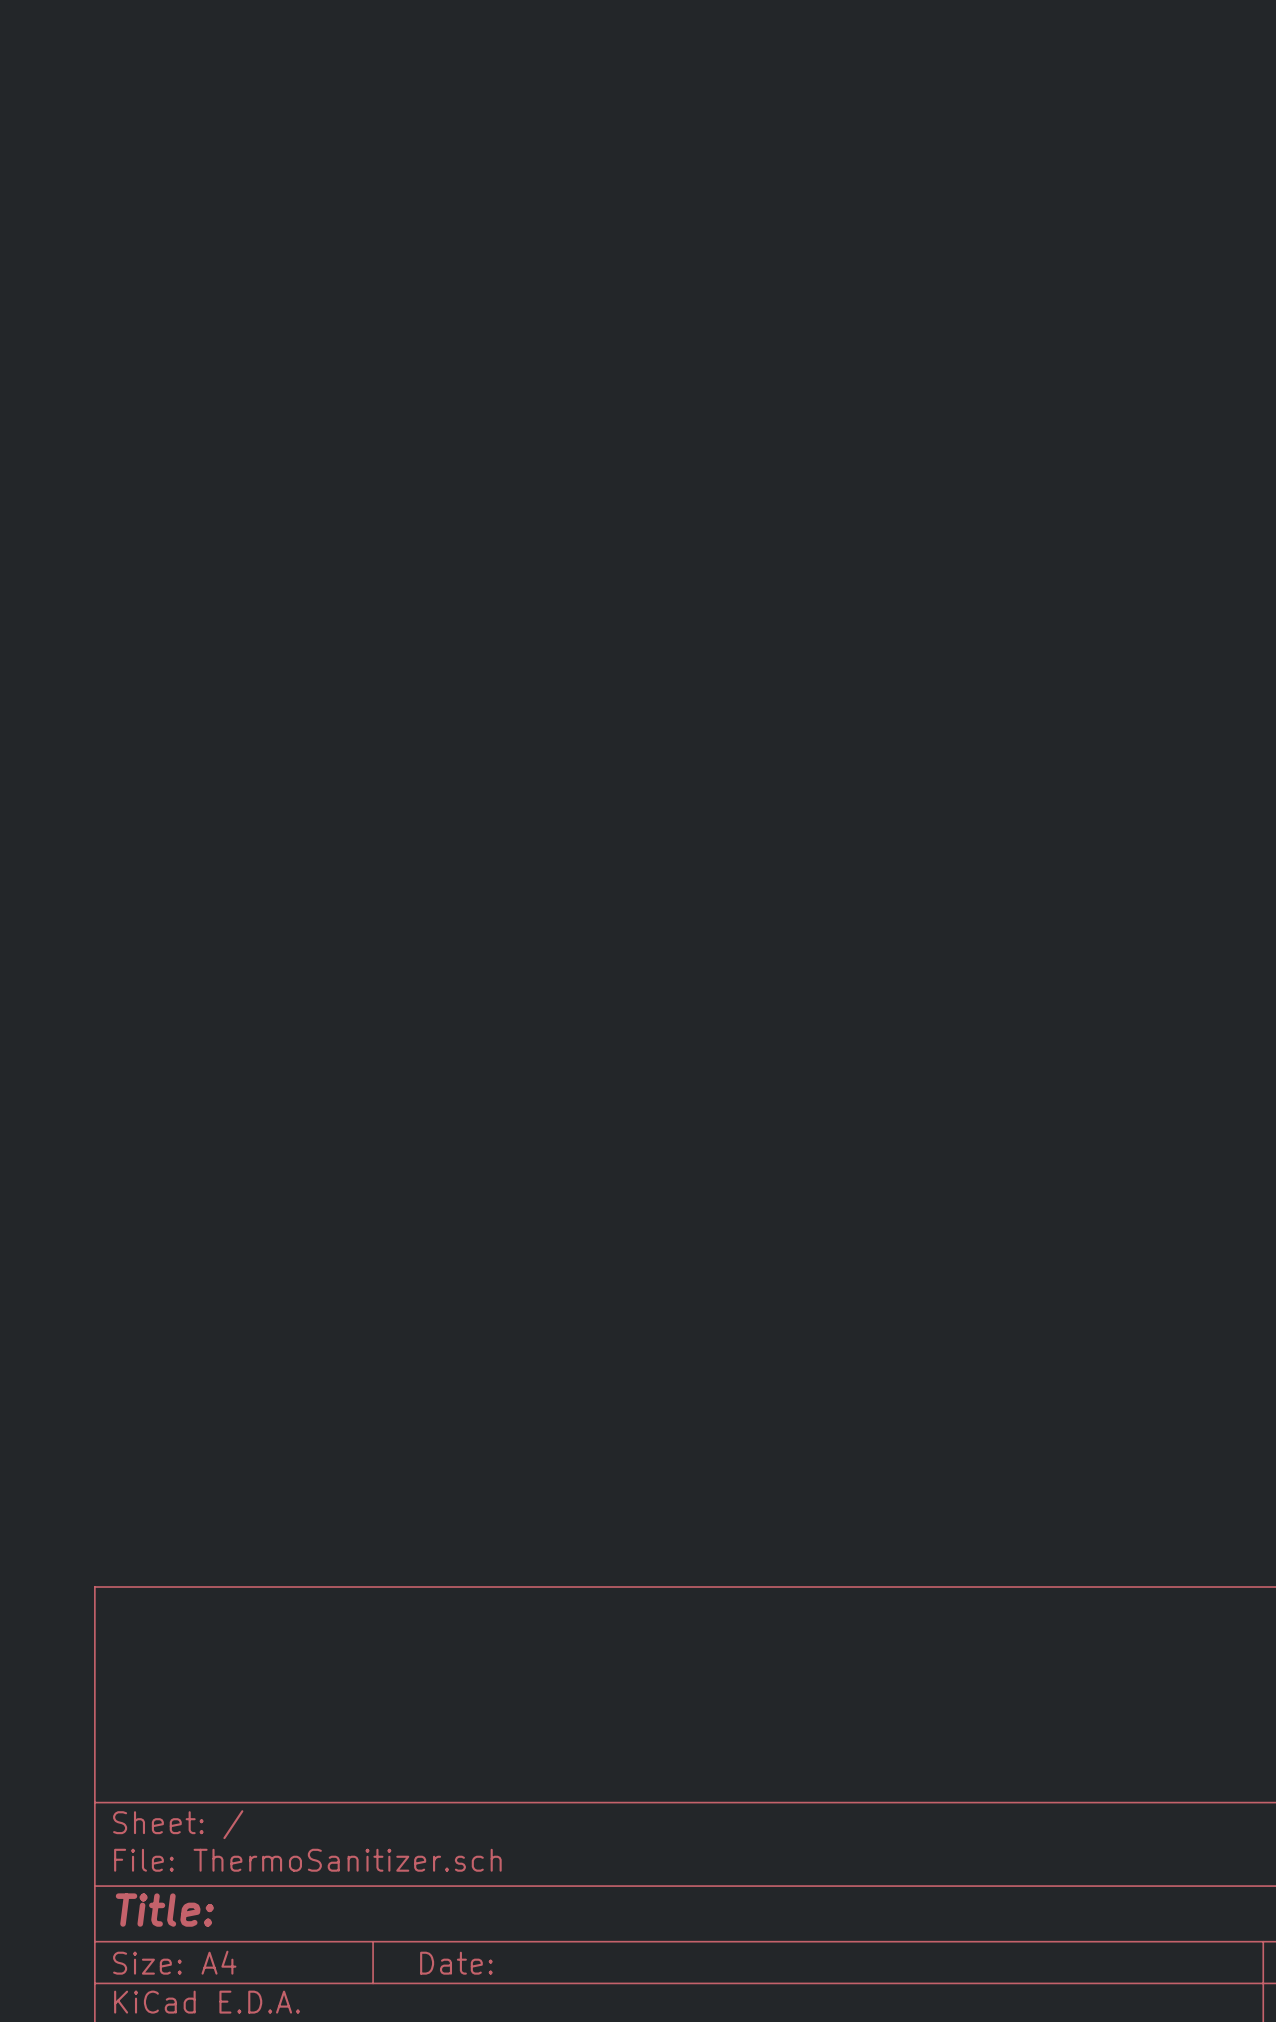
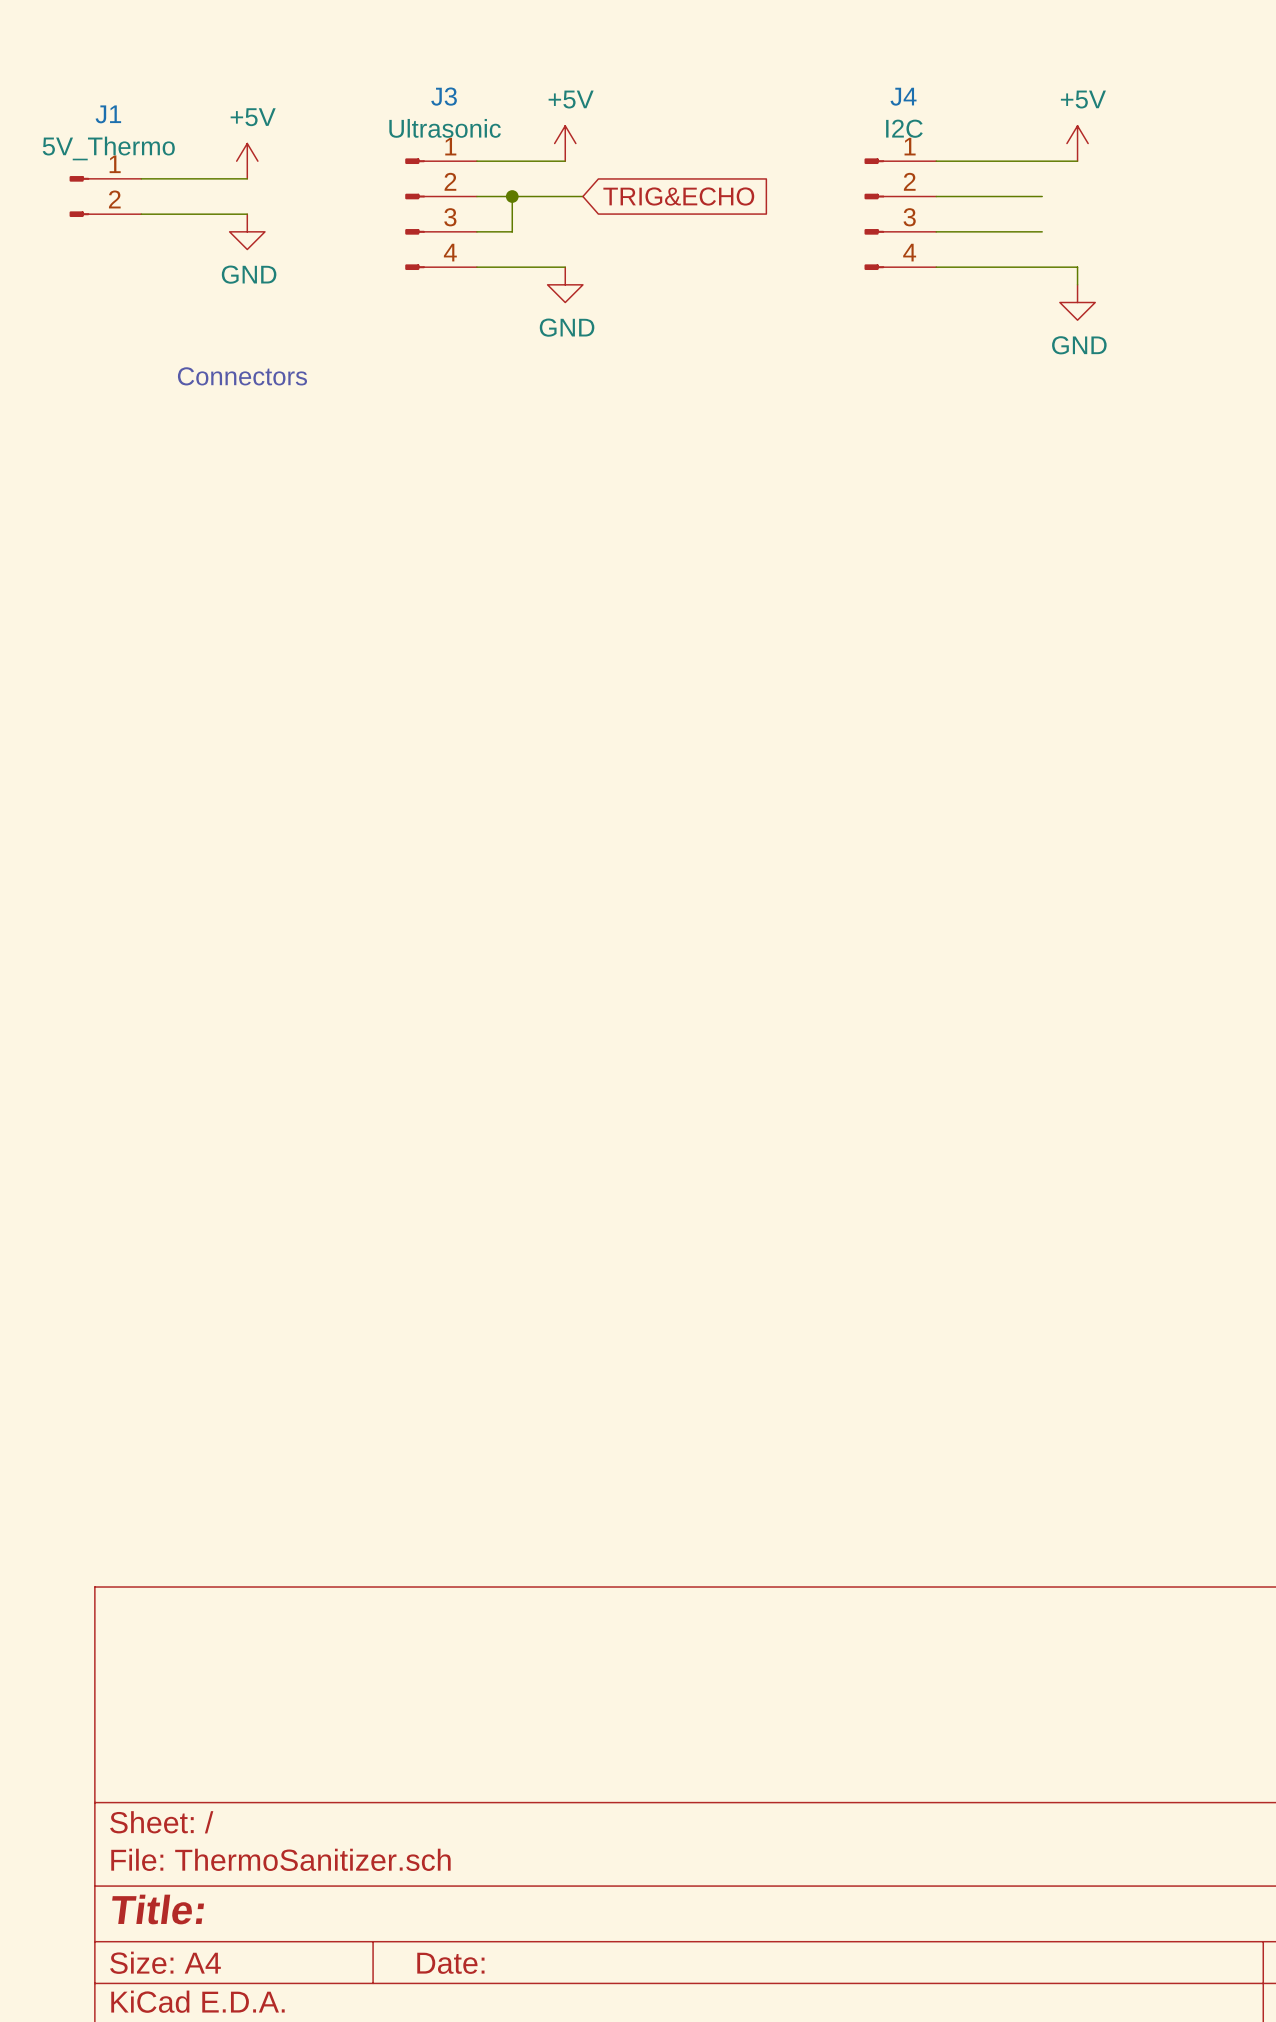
power symbol: none -> +5V (565, 143)
power symbol: none -> +5V (1077, 143)
power symbol: none -> +5V (247, 161)
wire: none -> (476, 161) (565, 161)
wire: none -> (936, 161) (1077, 161)
wire: none -> (141, 178) (247, 178)
J1: none -> 5V_Thermo (105, 196)
wire: none -> (476, 196) (582, 196)
wire: none -> (512, 196) (512, 231) (476, 231)
junction: none -> (512, 196)
global label: none -> TRIG&ECHO (678, 196)
wire: none -> (936, 196) (1042, 196)
wire: none -> (141, 214) (247, 214)
J3: none -> Ultrasonic (441, 214)
J4: none -> I2C (900, 214)
power symbol: none -> GND (247, 231)
wire: none -> (936, 231) (1042, 231)
wire: none -> (476, 267) (565, 267)
wire: none -> (936, 267) (1077, 267) (1077, 284)
power symbol: none -> GND (565, 284)
power symbol: none -> GND (1077, 302)
text: none -> Connectors (242, 376)

